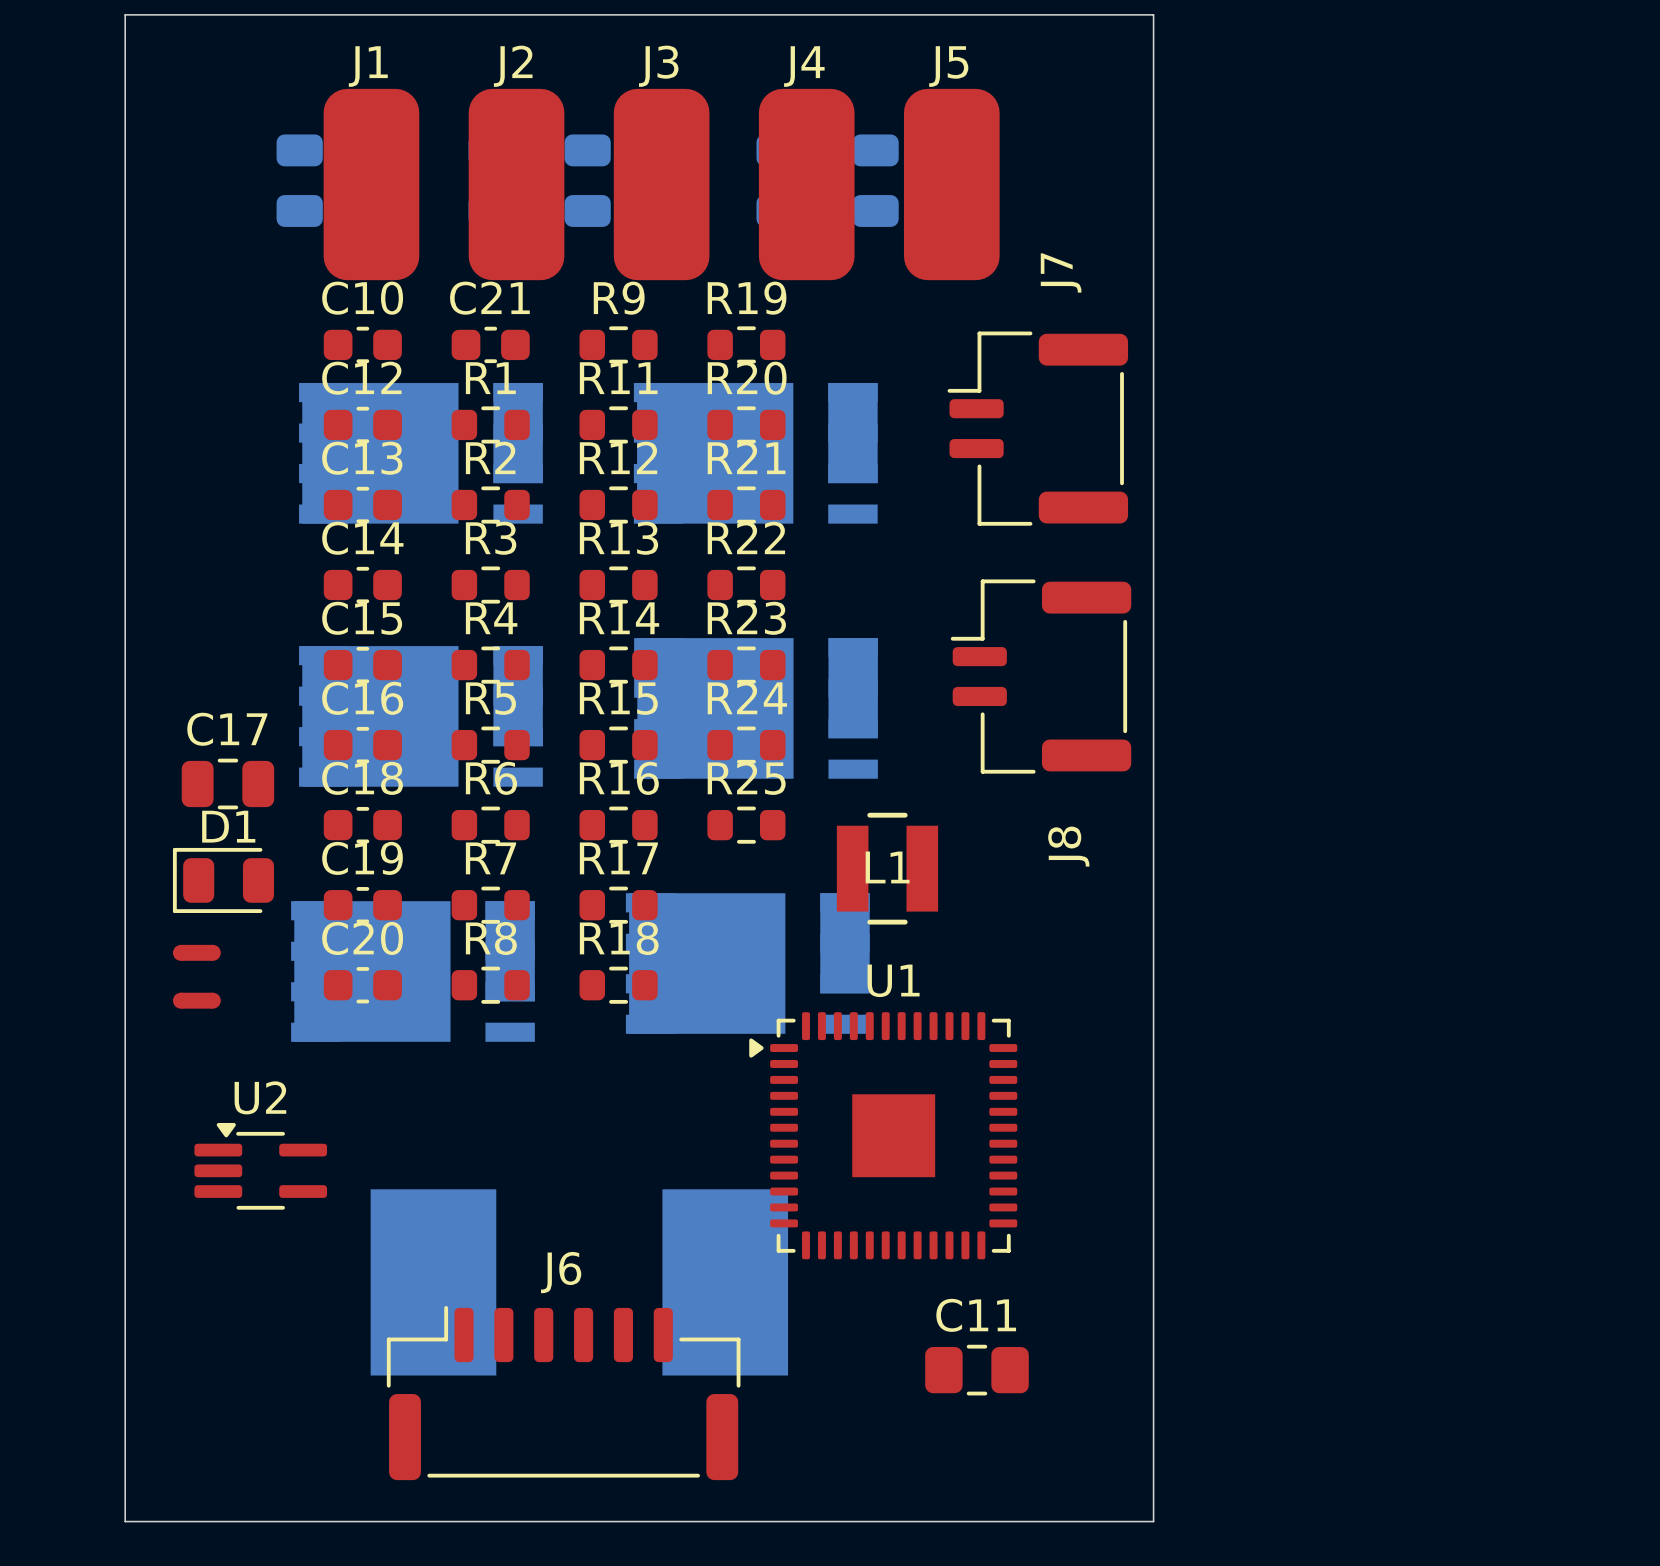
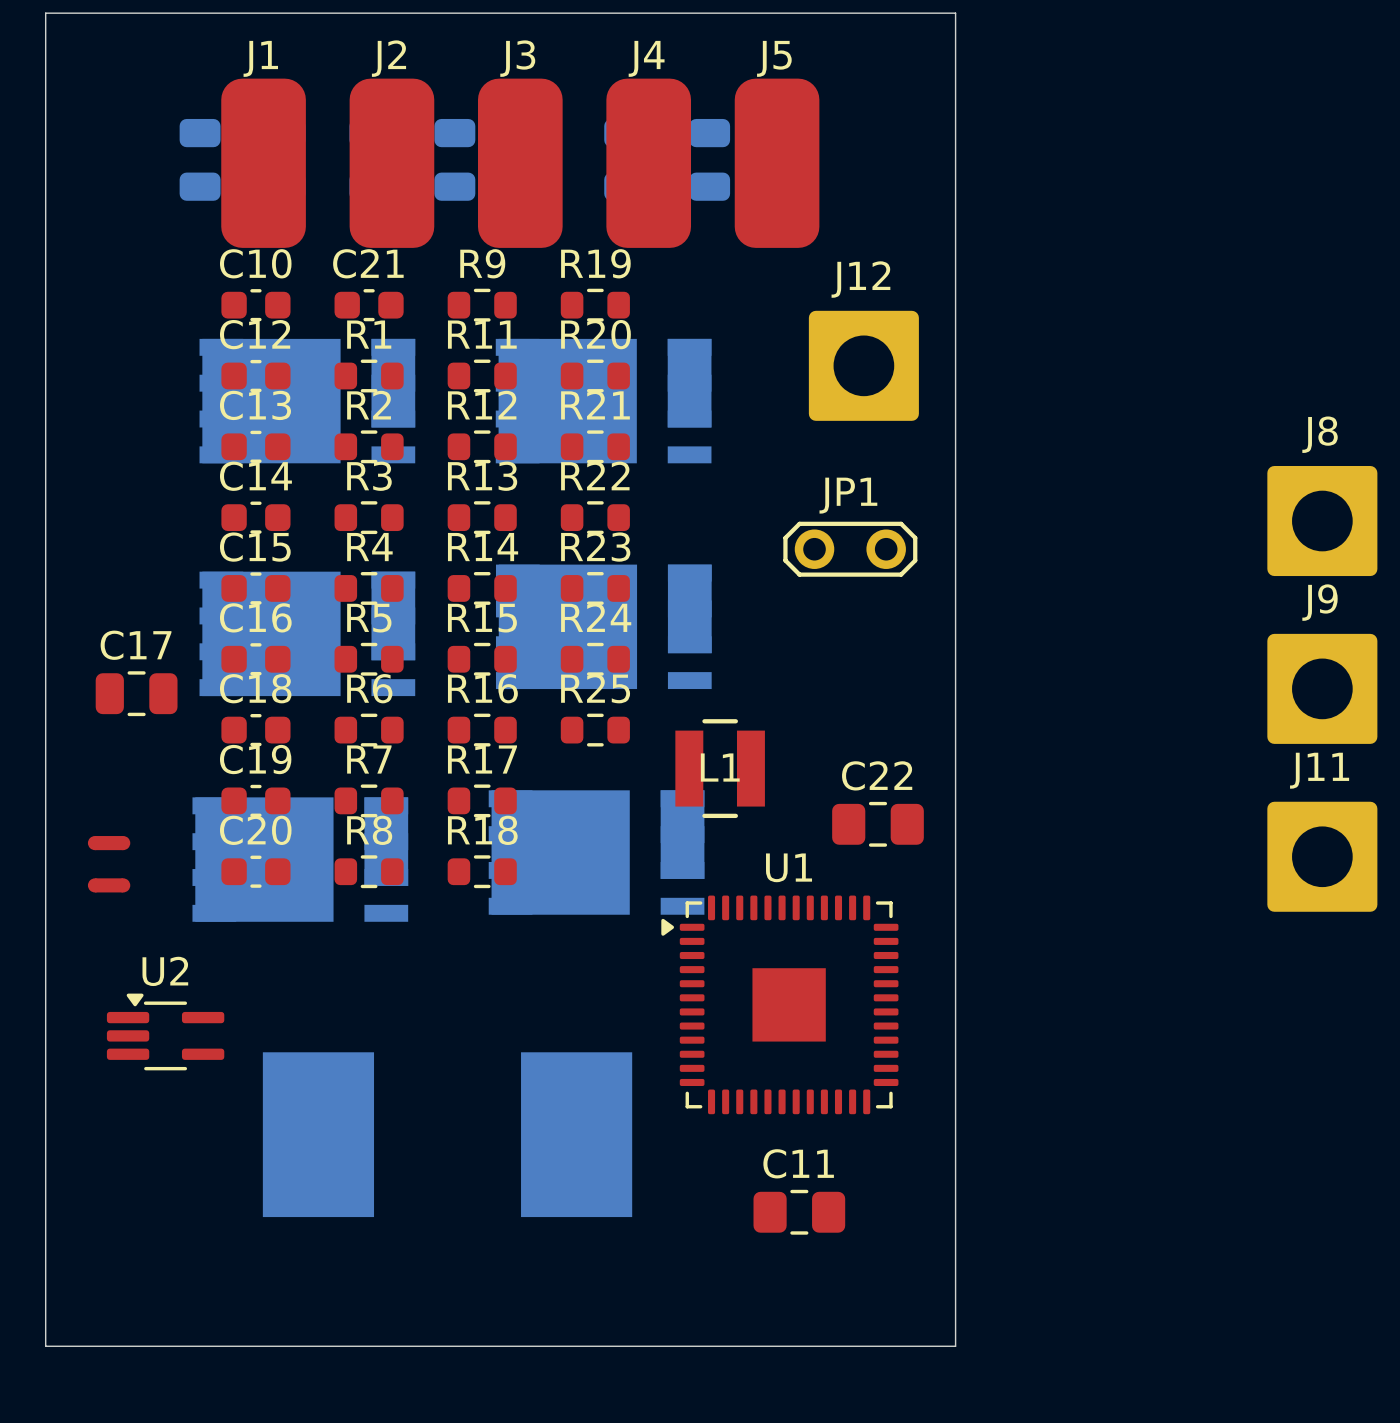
J12: none -> (863, 365)
J7: (1037, 428) -> none
J8 footprint: [950, 579, 1132, 774] -> [1267, 466, 1378, 577]
JP1: none -> (850, 549)
J9: none -> (1322, 688)
J8 name position: J8 (1068, 846) -> J8 (1320, 434)
D1: (223, 880) -> none
C22: none -> (877, 824)
J11: none -> (1322, 856)
U1 position: (883, 1135) -> (779, 1004)
J6: (563, 1393) -> none

